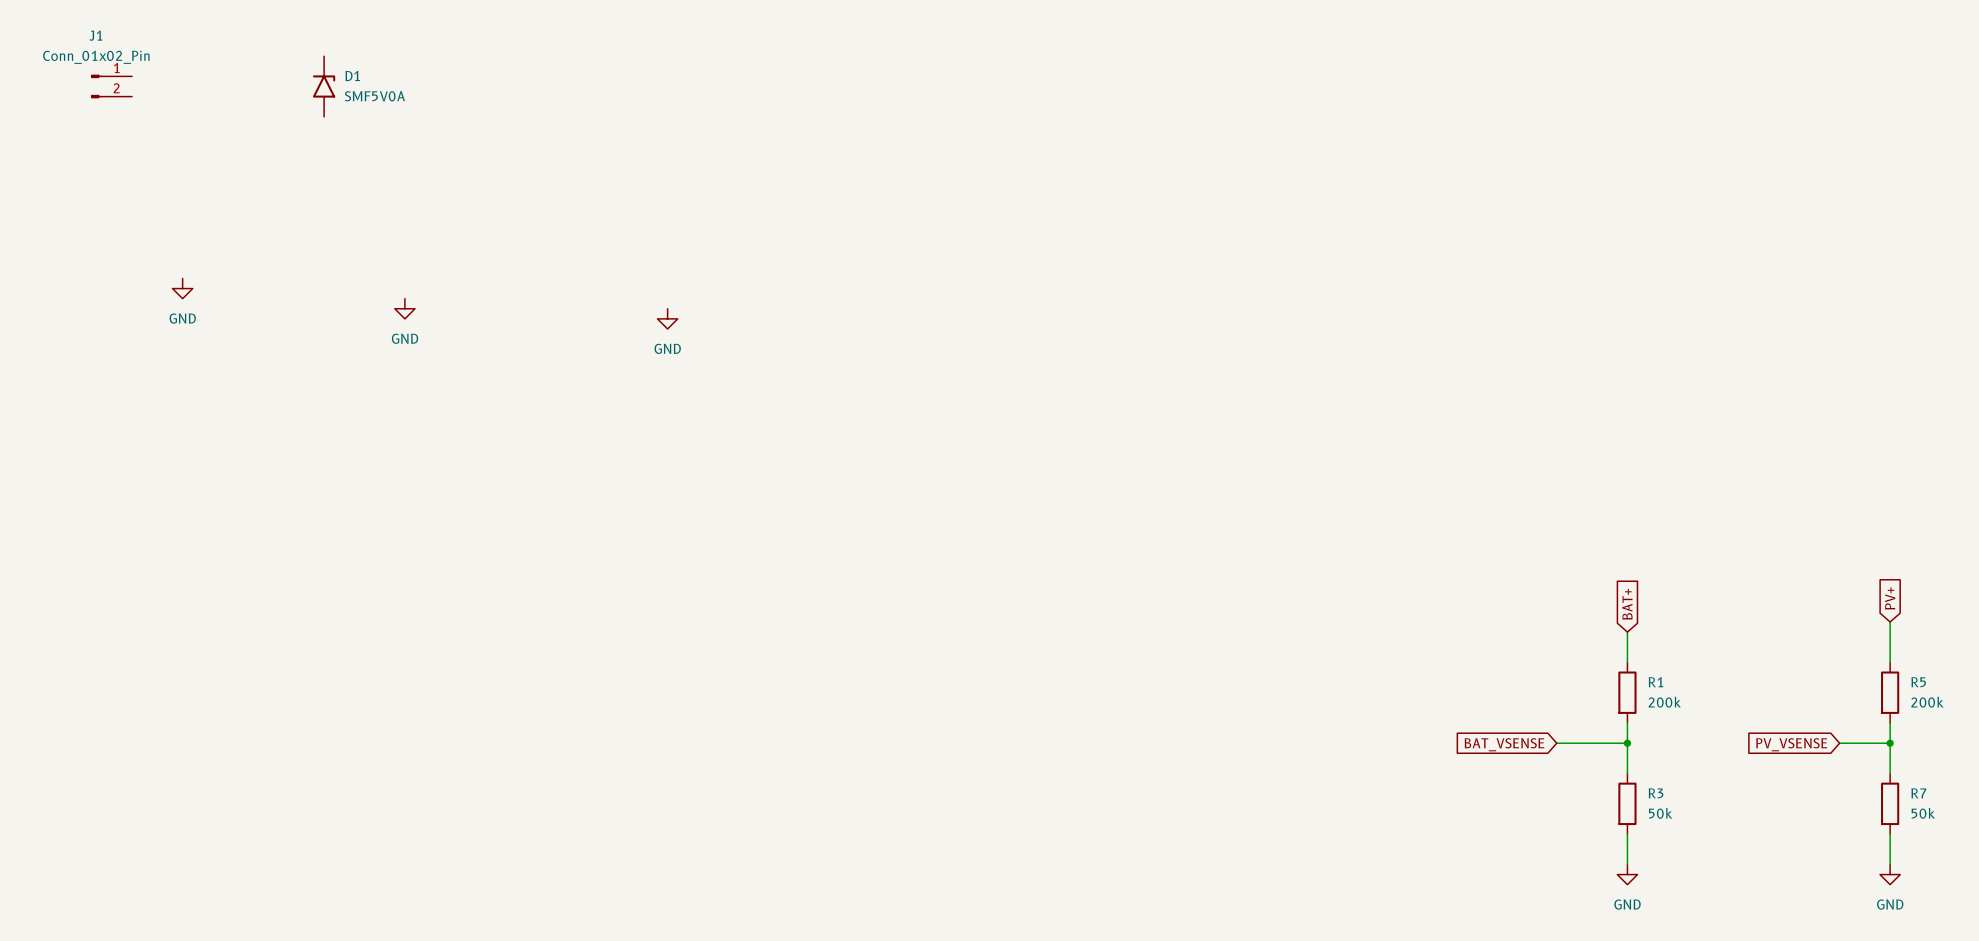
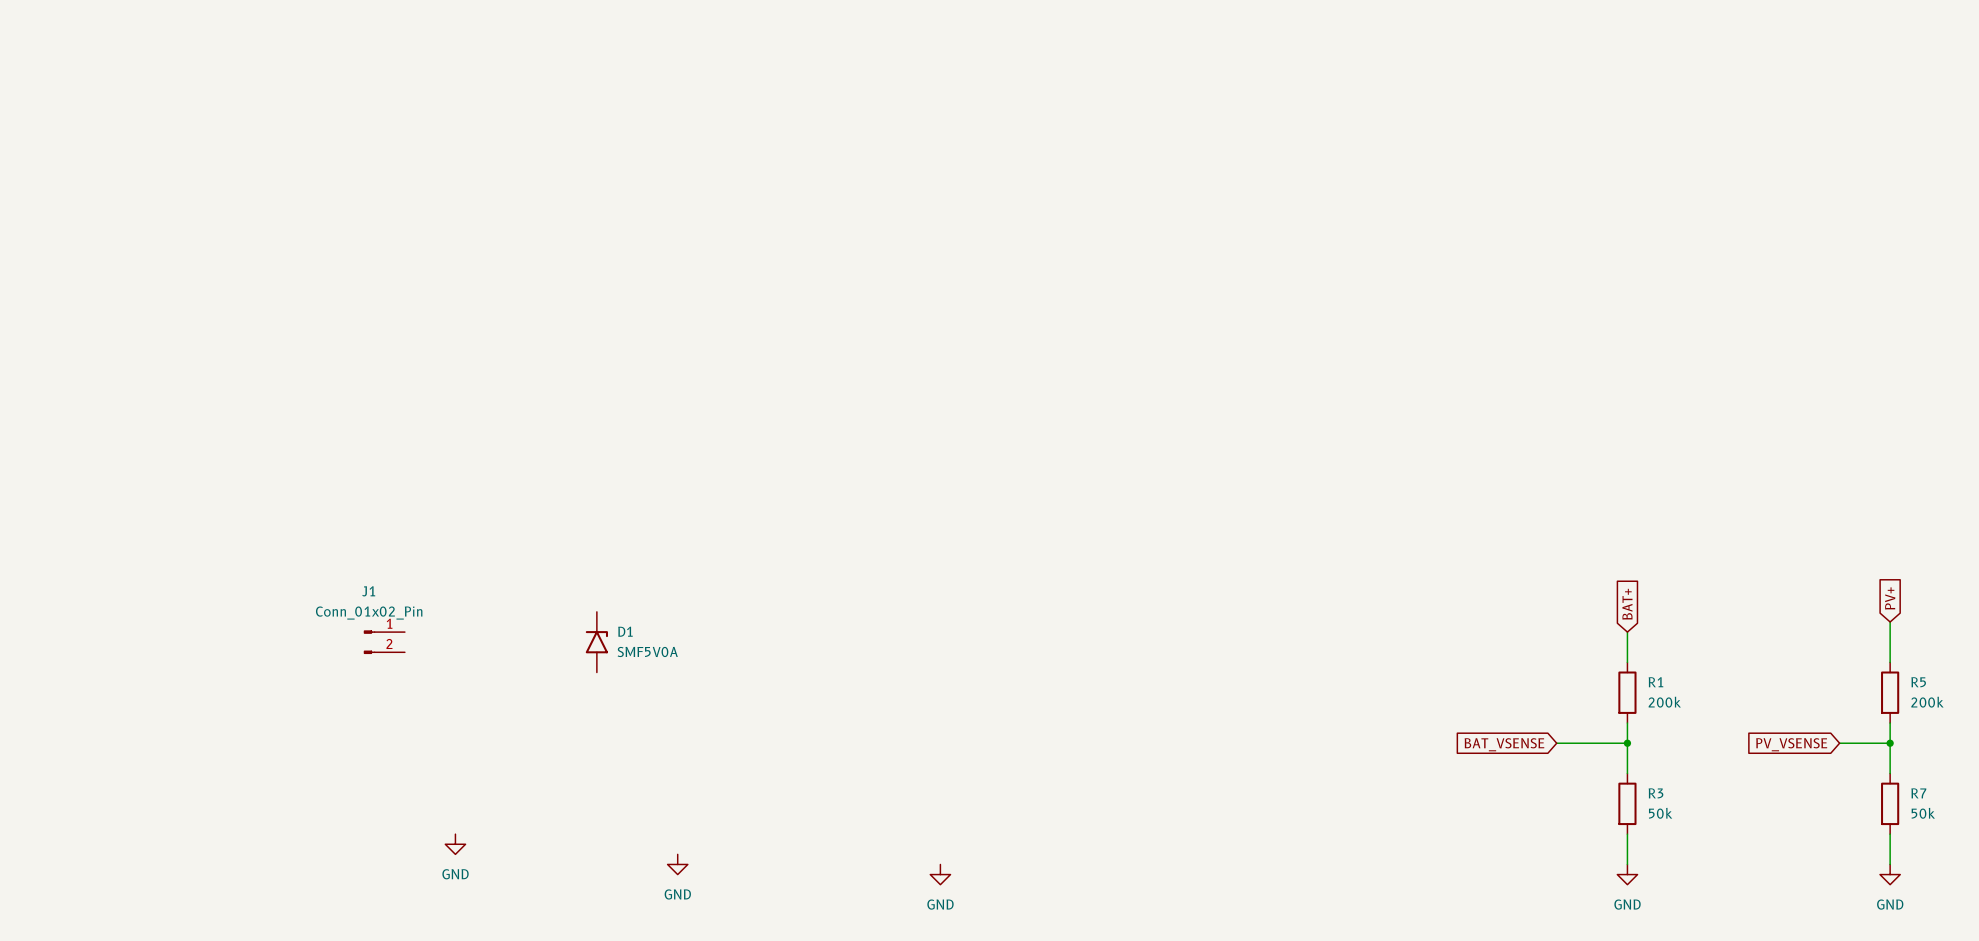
J1 position: (111, 86) -> (384, 642)
D1 position: (324, 86) -> (596, 642)
power symbol: GND (182, 288) -> none
power symbol: GND (404, 308) -> none
power symbol: GND (667, 318) -> none
power symbol: none -> GND (455, 844)
power symbol: none -> GND (677, 864)
power symbol: none -> GND (940, 874)

